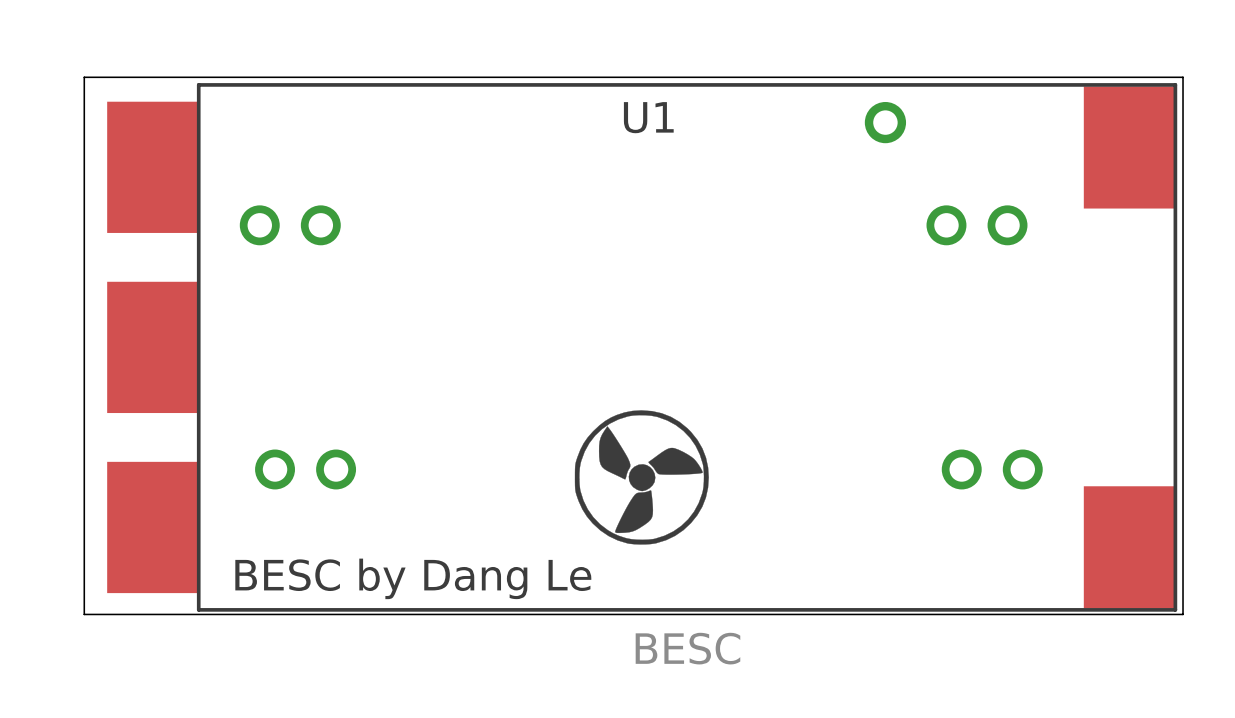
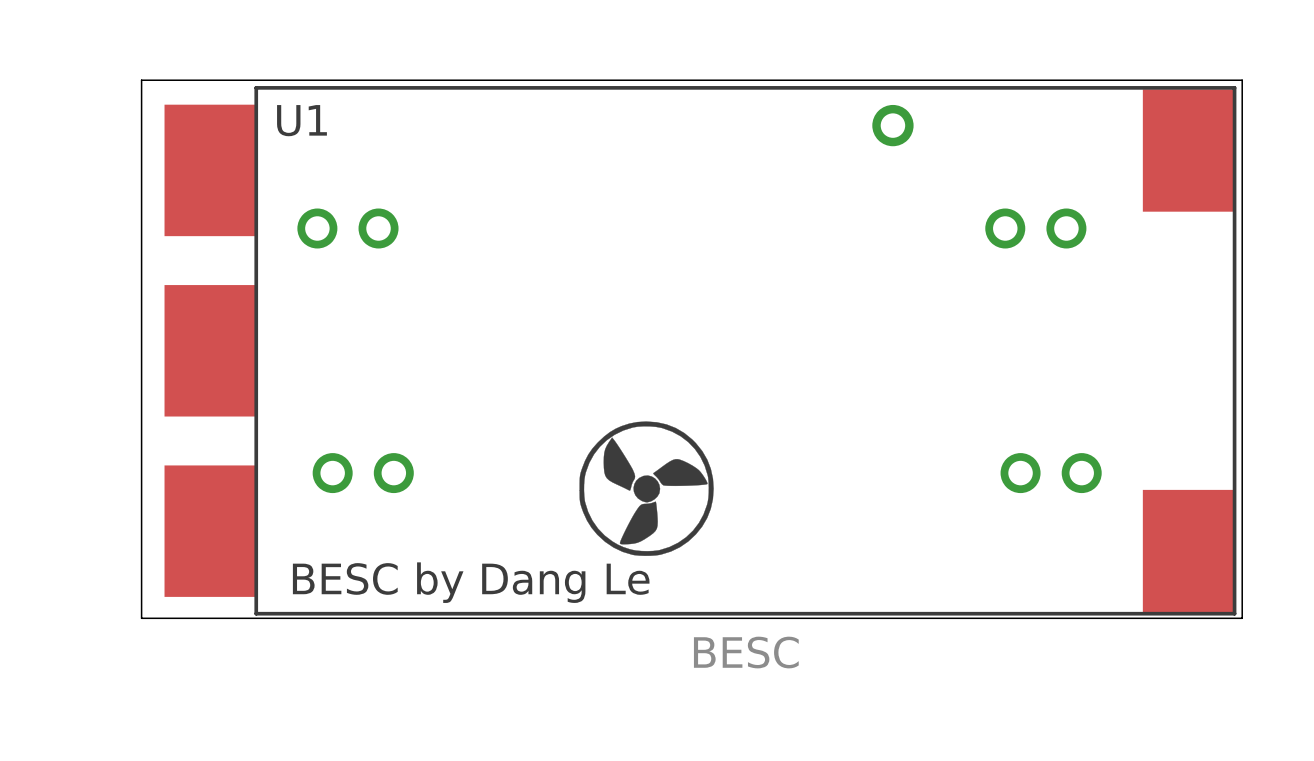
U1 footprint: [107, 83, 1178, 612] -> [164, 86, 1237, 616]
U1 name position: U1 (648, 117) -> U1 (301, 120)
drawing position: (641, 477) -> (646, 488)

